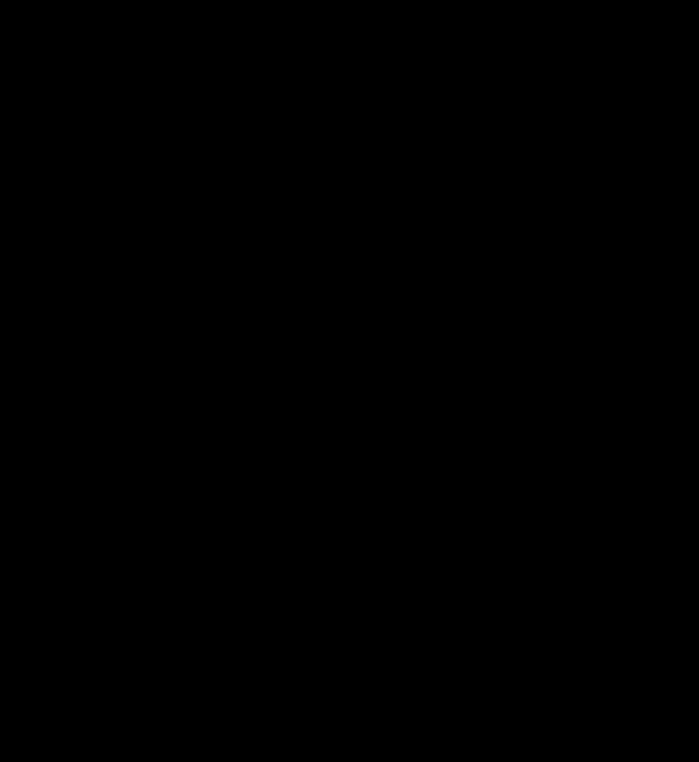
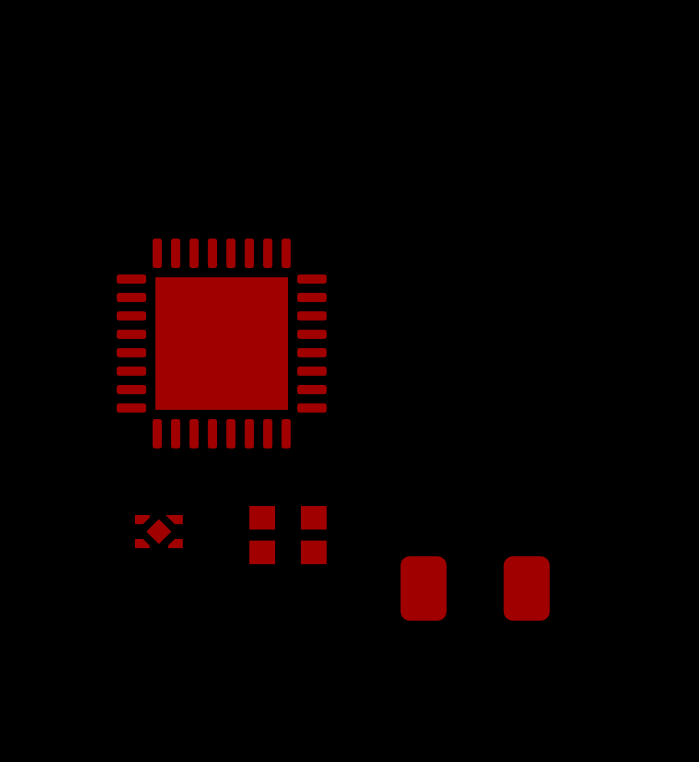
part: none -> (221, 343)
part: none -> (158, 531)
part: none -> (287, 535)
part: none -> (475, 588)

